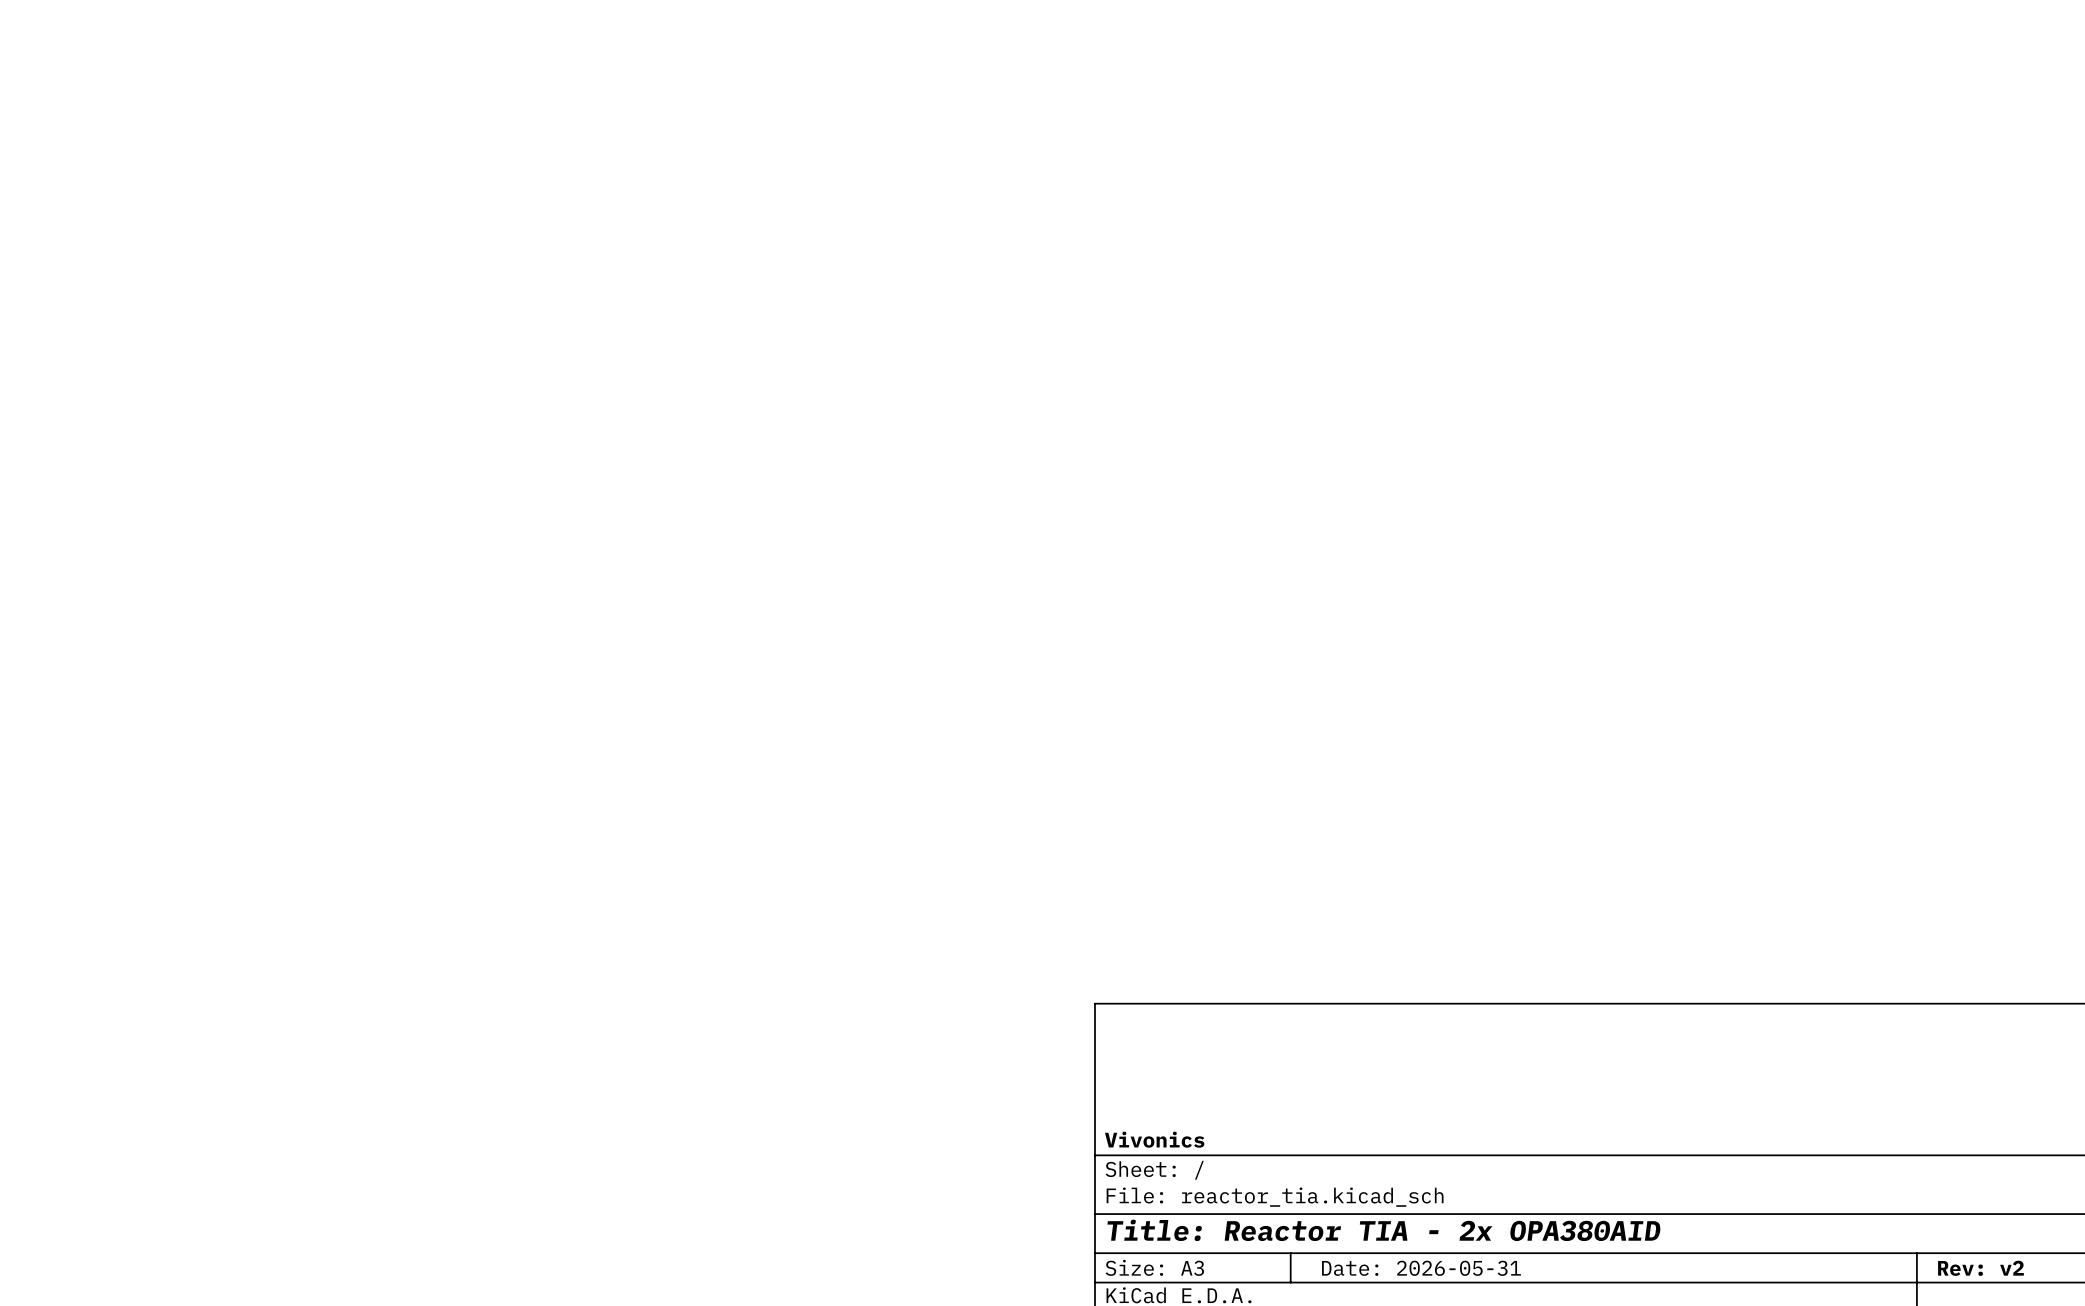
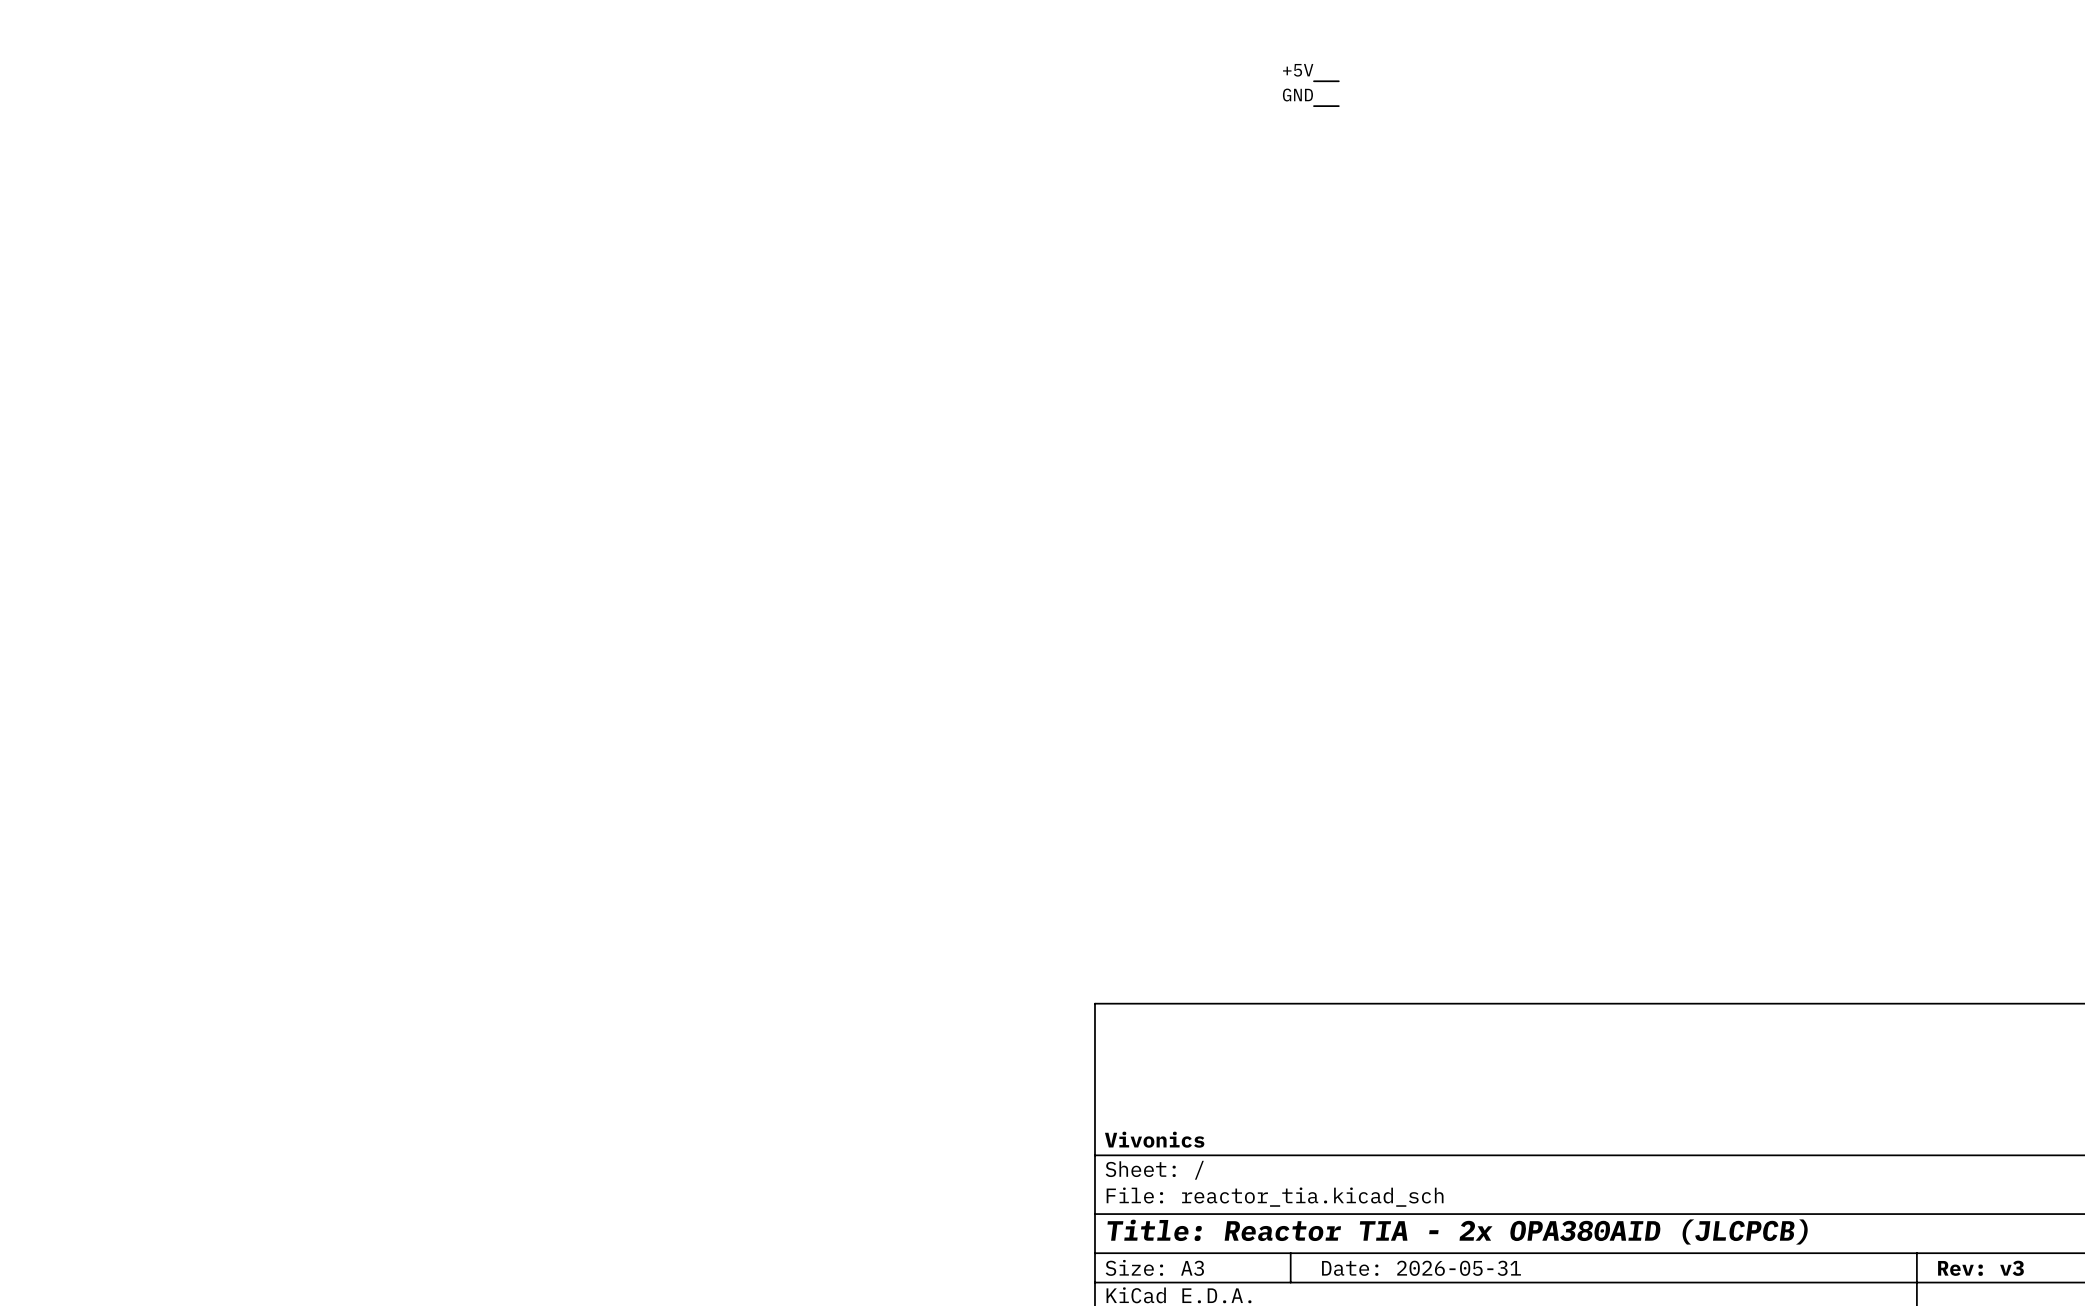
label: none -> +5V (1298, 70)
wire: none -> (1313, 81) (1338, 81)
label: none -> GND (1297, 95)
wire: none -> (1313, 106) (1338, 106)
title block: Title: Reactor TIA - 2x OPA380AID (1384, 1230) -> Title: Reactor TIA - 2x OPA380AID (JLCPCB) (1457, 1232)
title block: Rev: v2 (1980, 1268) -> Rev: v3 (1980, 1268)

